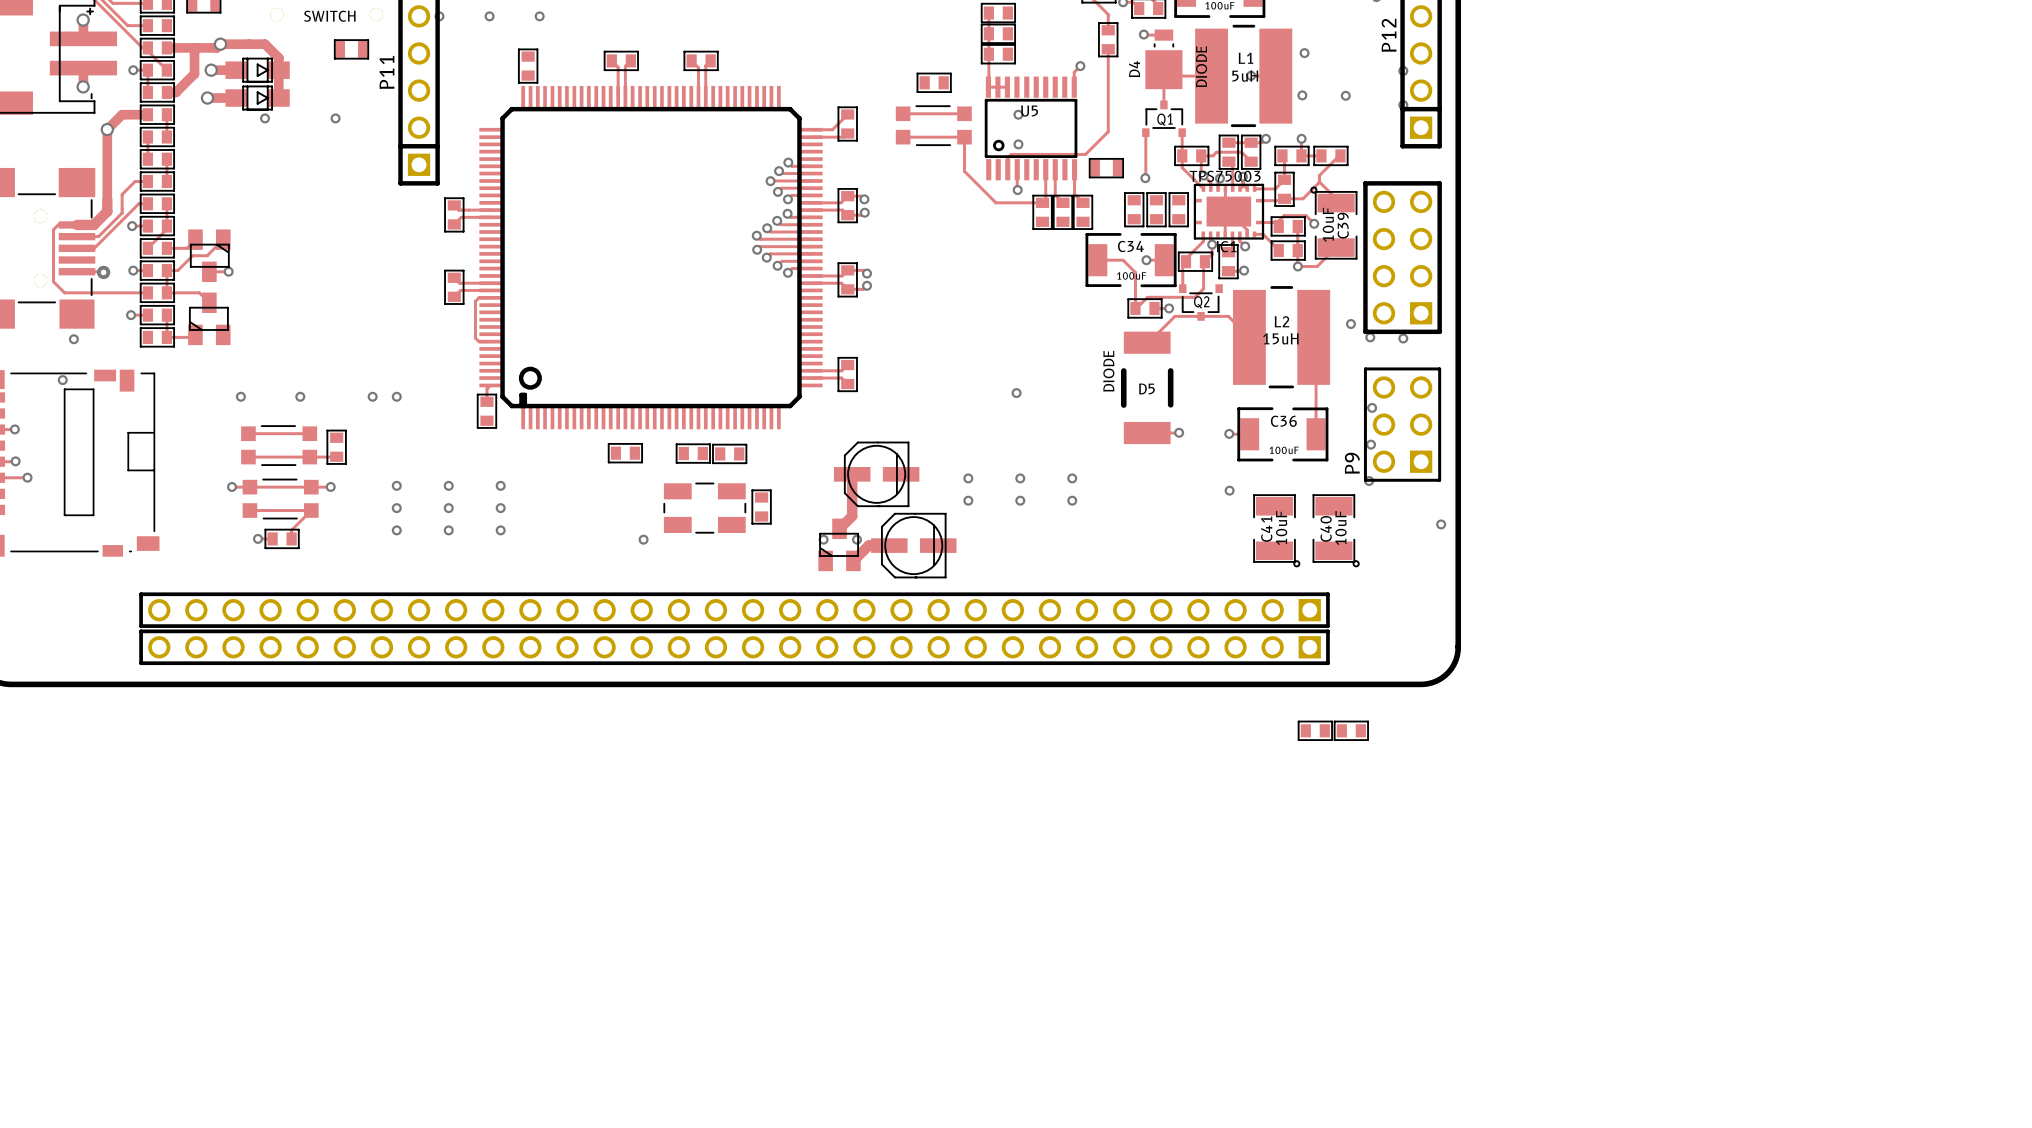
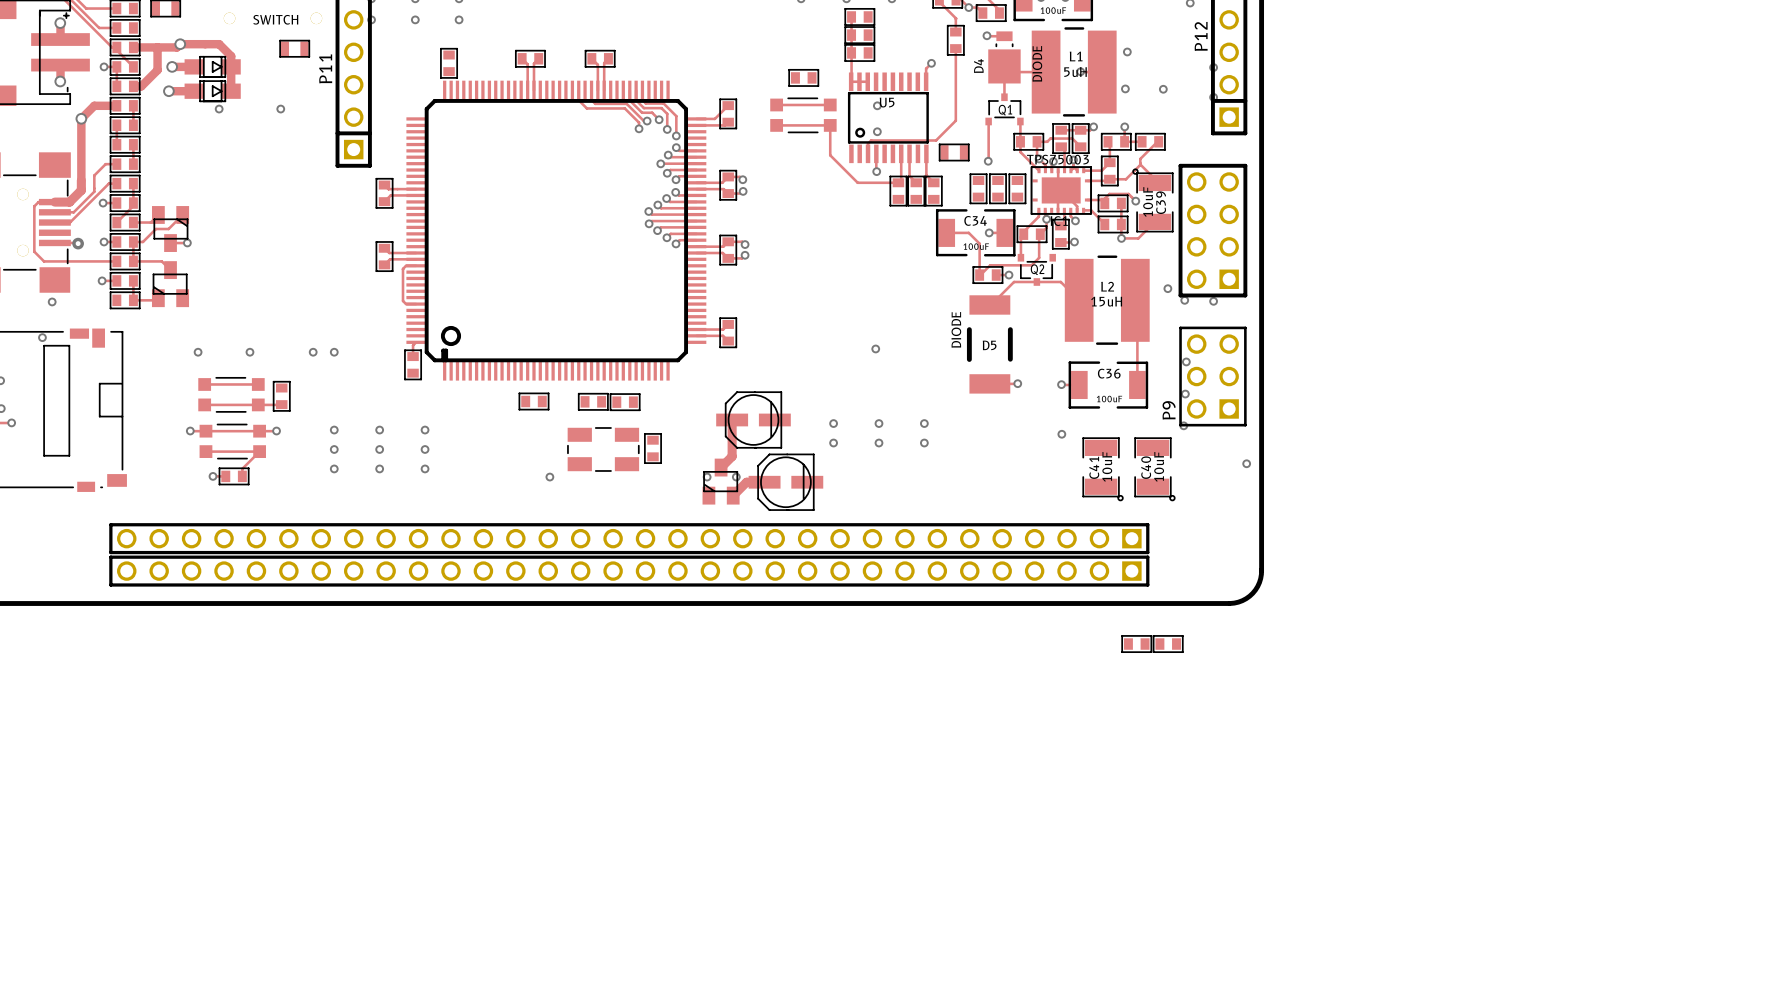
track: none -> (578, 90) (578, 100) (586, 108) (624, 108) (639, 122) (639, 128)
track: none -> (591, 90) (591, 100) (595, 103) (626, 103) (643, 121) (647, 121)
track: none -> (629, 90) (629, 100) (642, 112) (652, 112) (659, 119)
track: none -> (636, 90) (636, 100) (643, 108) (661, 108) (667, 113) (667, 129)
track: none -> (642, 90) (642, 100) (645, 103) (663, 103) (676, 116) (676, 135)
via: none -> (659, 119)
via: none -> (647, 121)
via: none -> (639, 128)
via: none -> (667, 129)
via: none -> (676, 135)

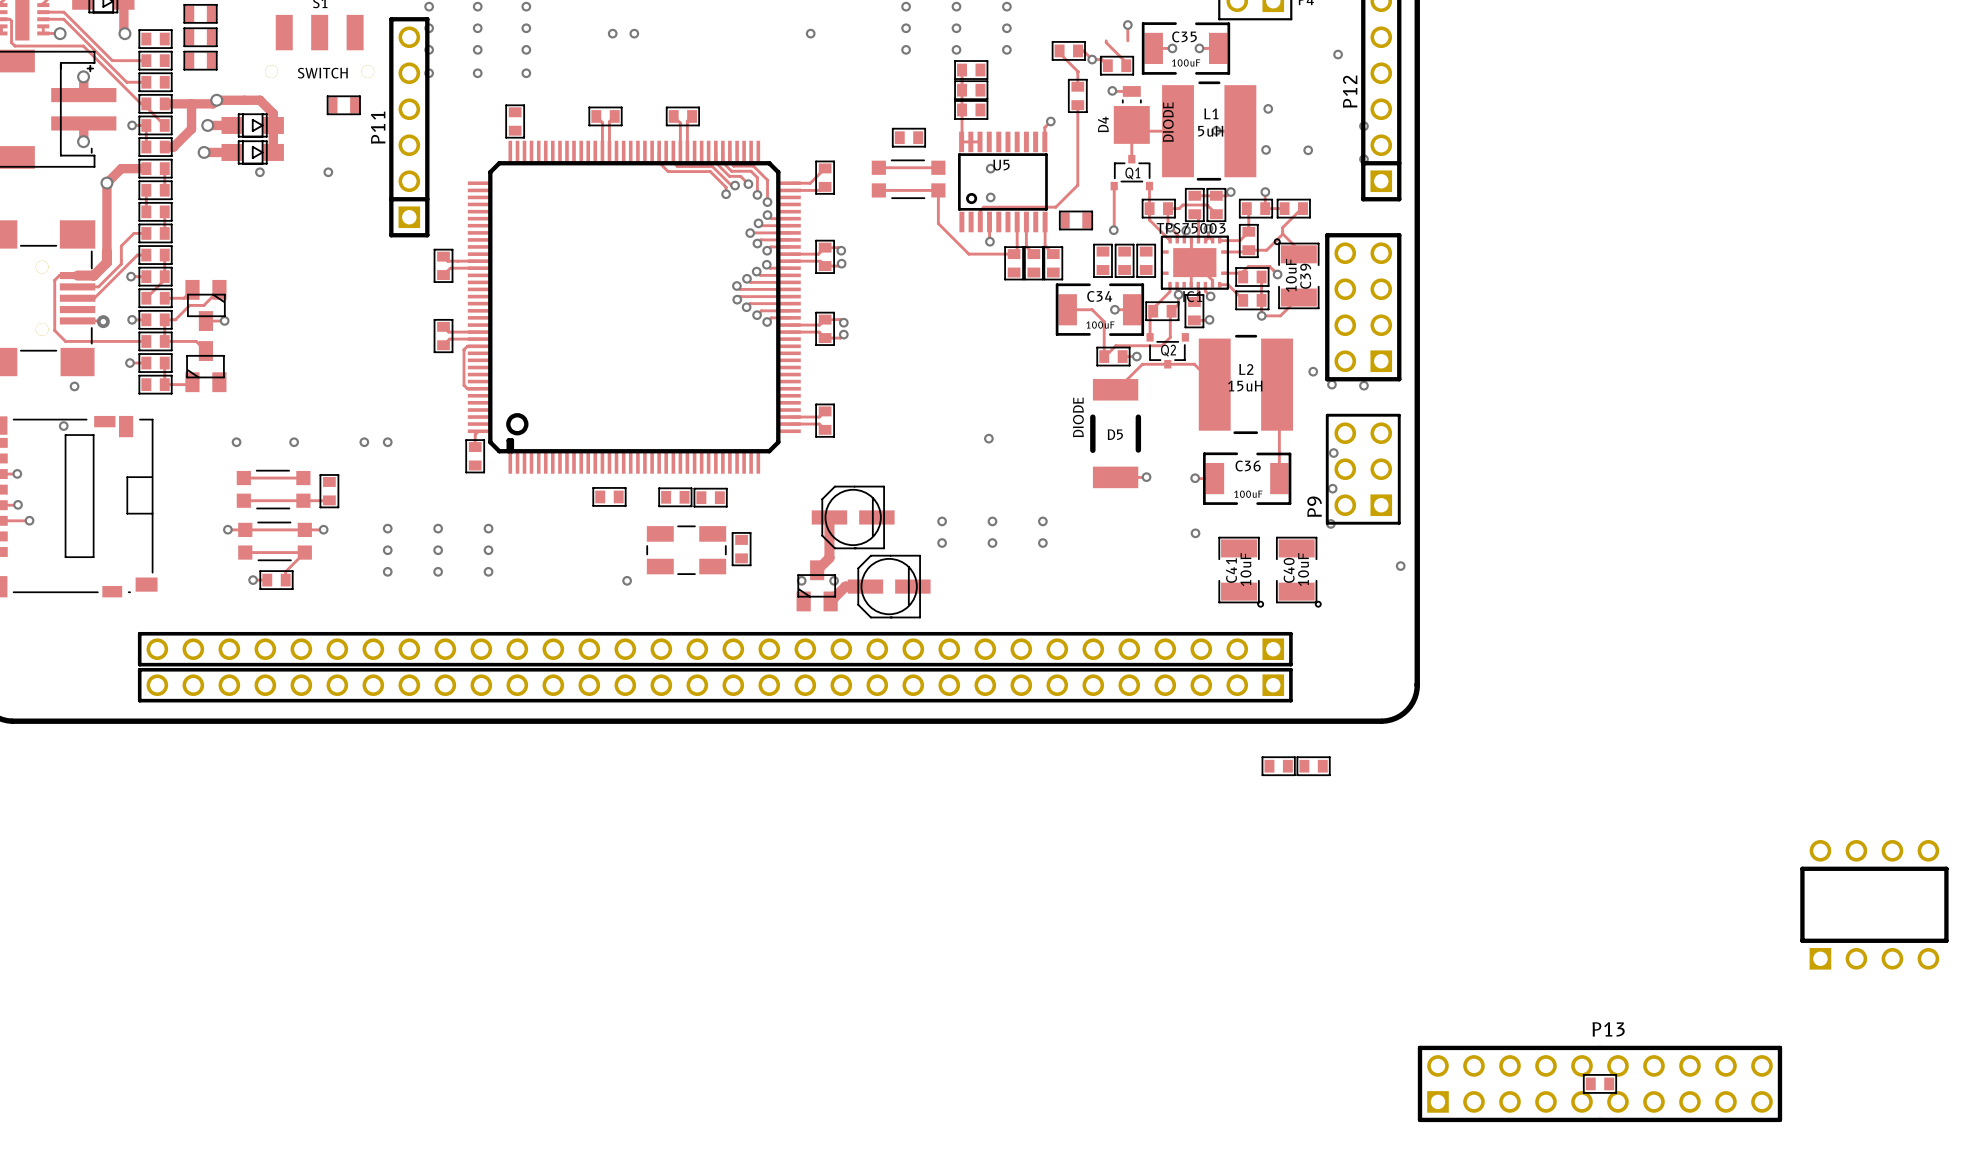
part: none -> (1874, 904)
P13: none -> (1599, 1083)
part: none -> (1599, 1083)

